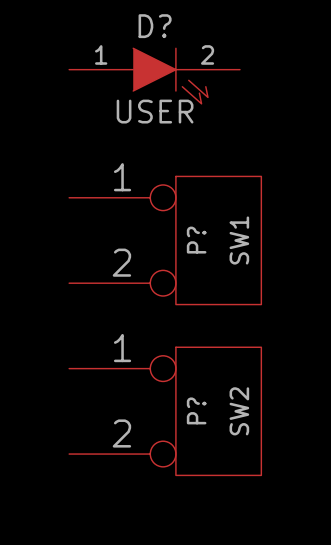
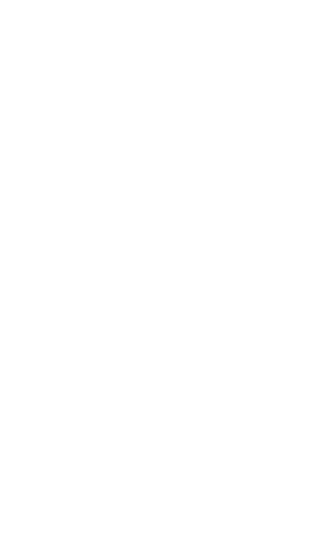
D?: USER (154, 76) -> none
P?: SW1 (165, 240) -> none
P?: SW2 (165, 411) -> none

